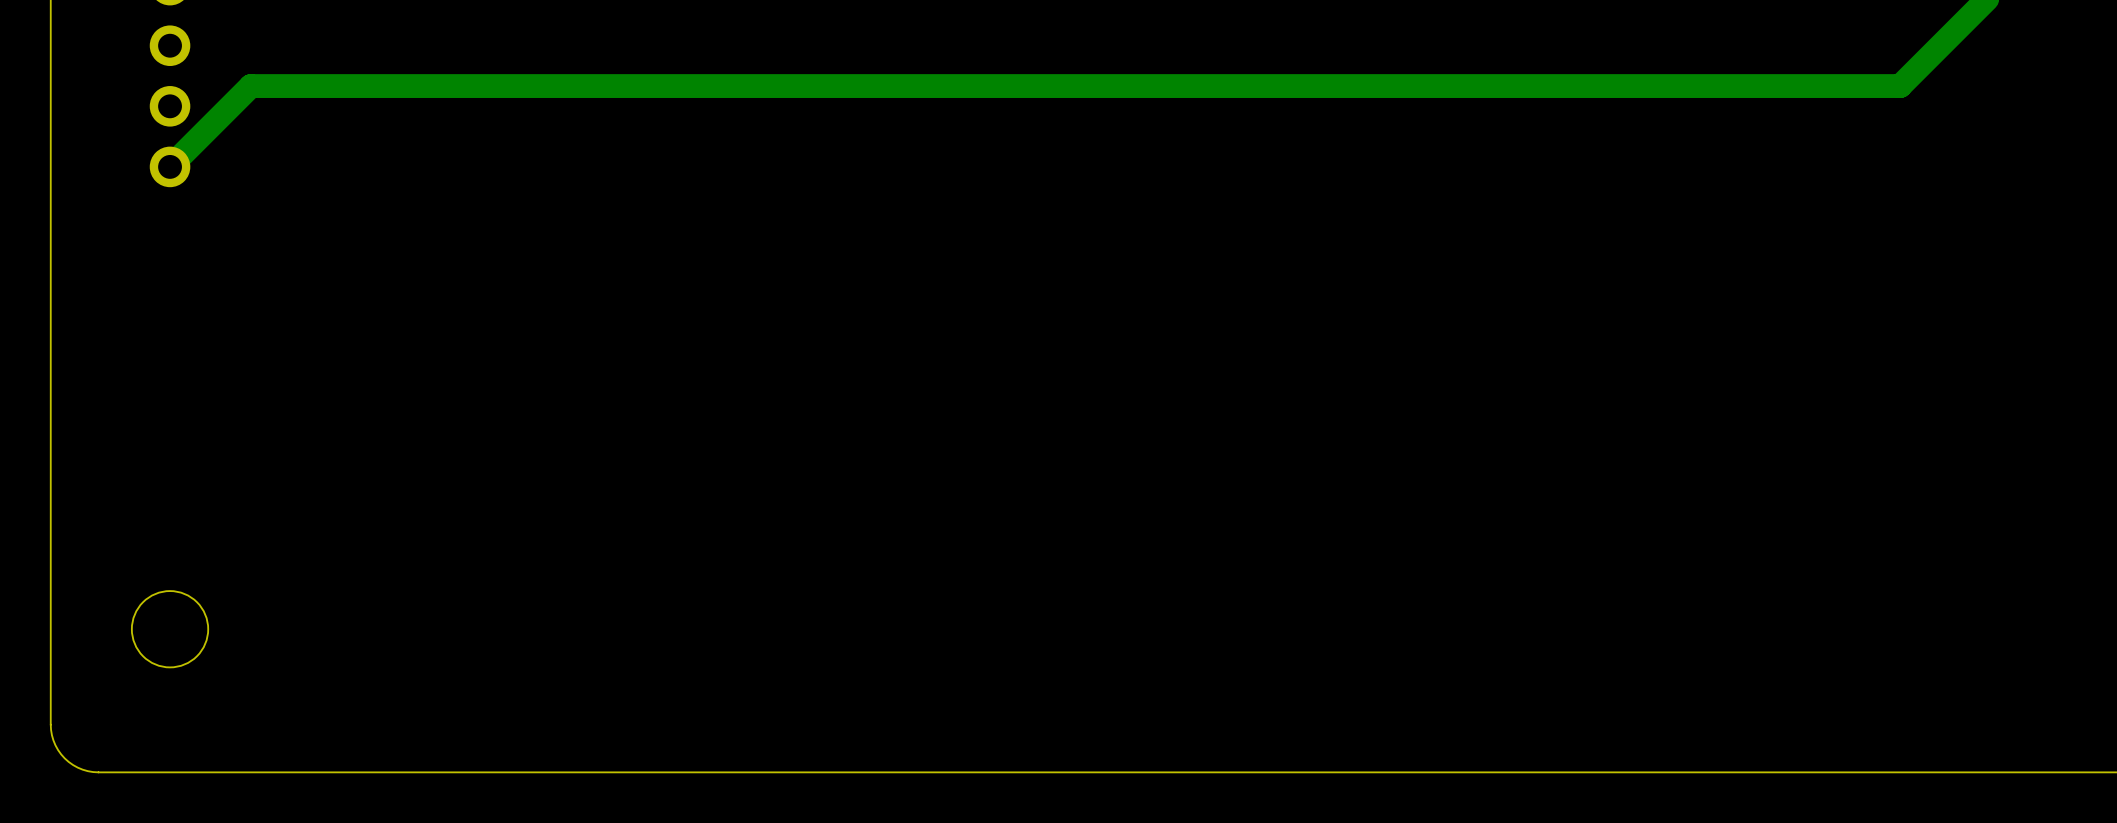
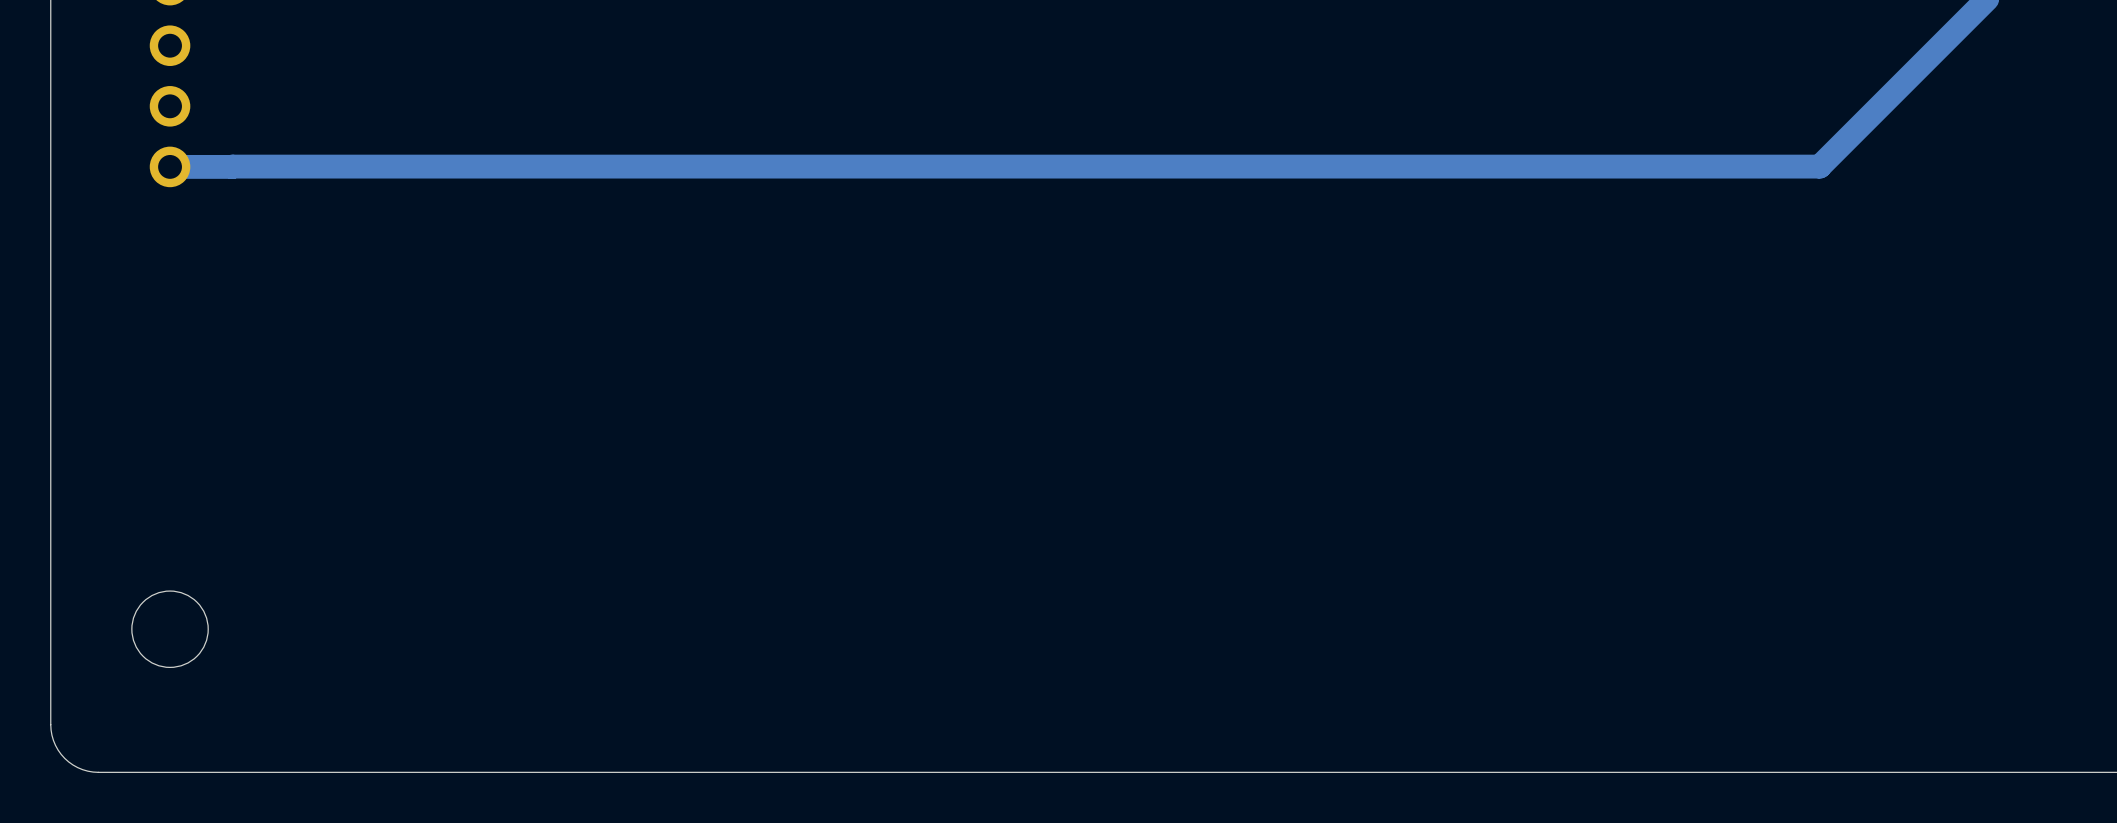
track: (1900, 86) (250, 86) (170, 166) -> (1900, 86) (1819, 166) (232, 166)
track: none -> (232, 166) (170, 166)

